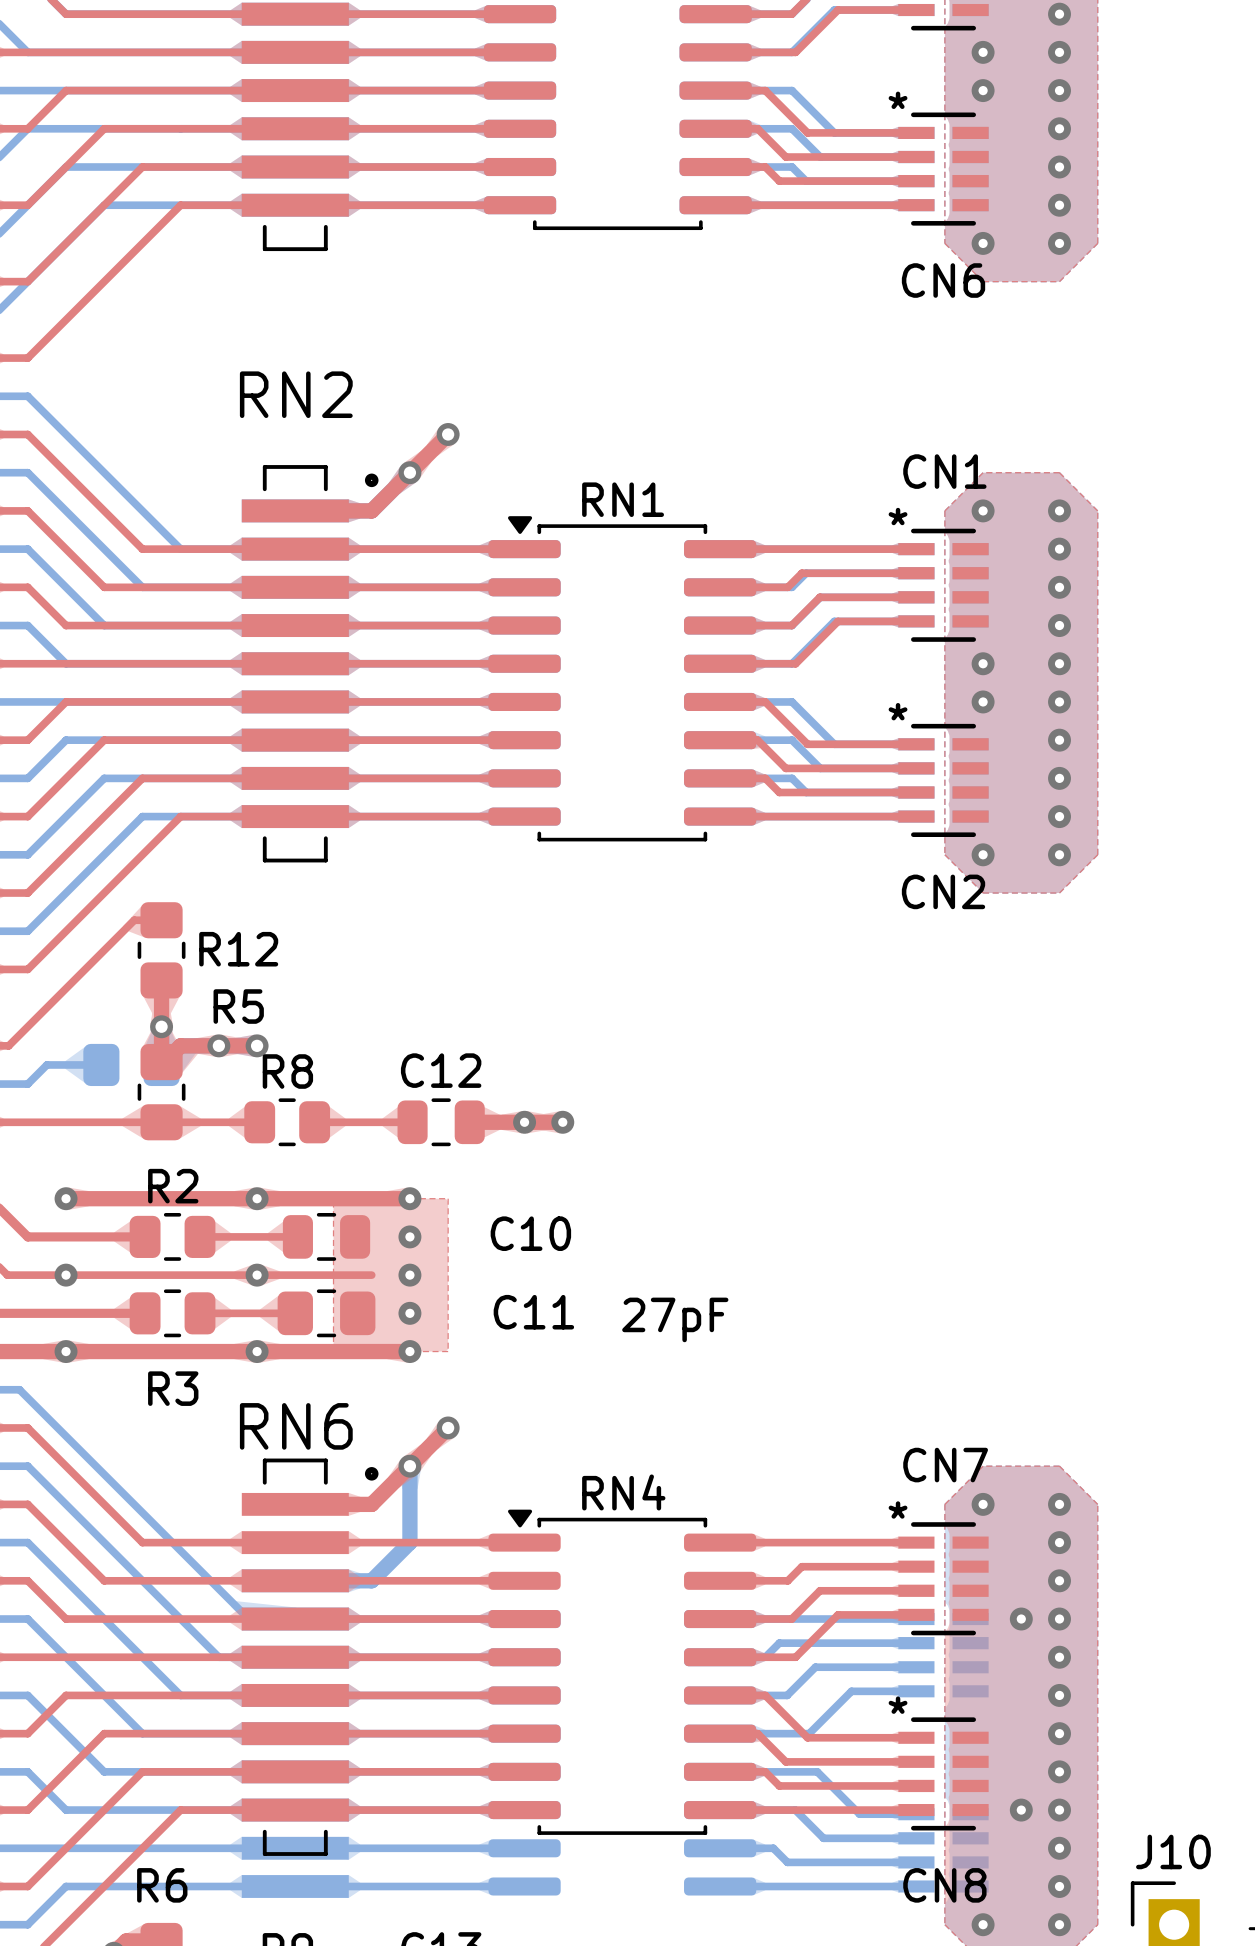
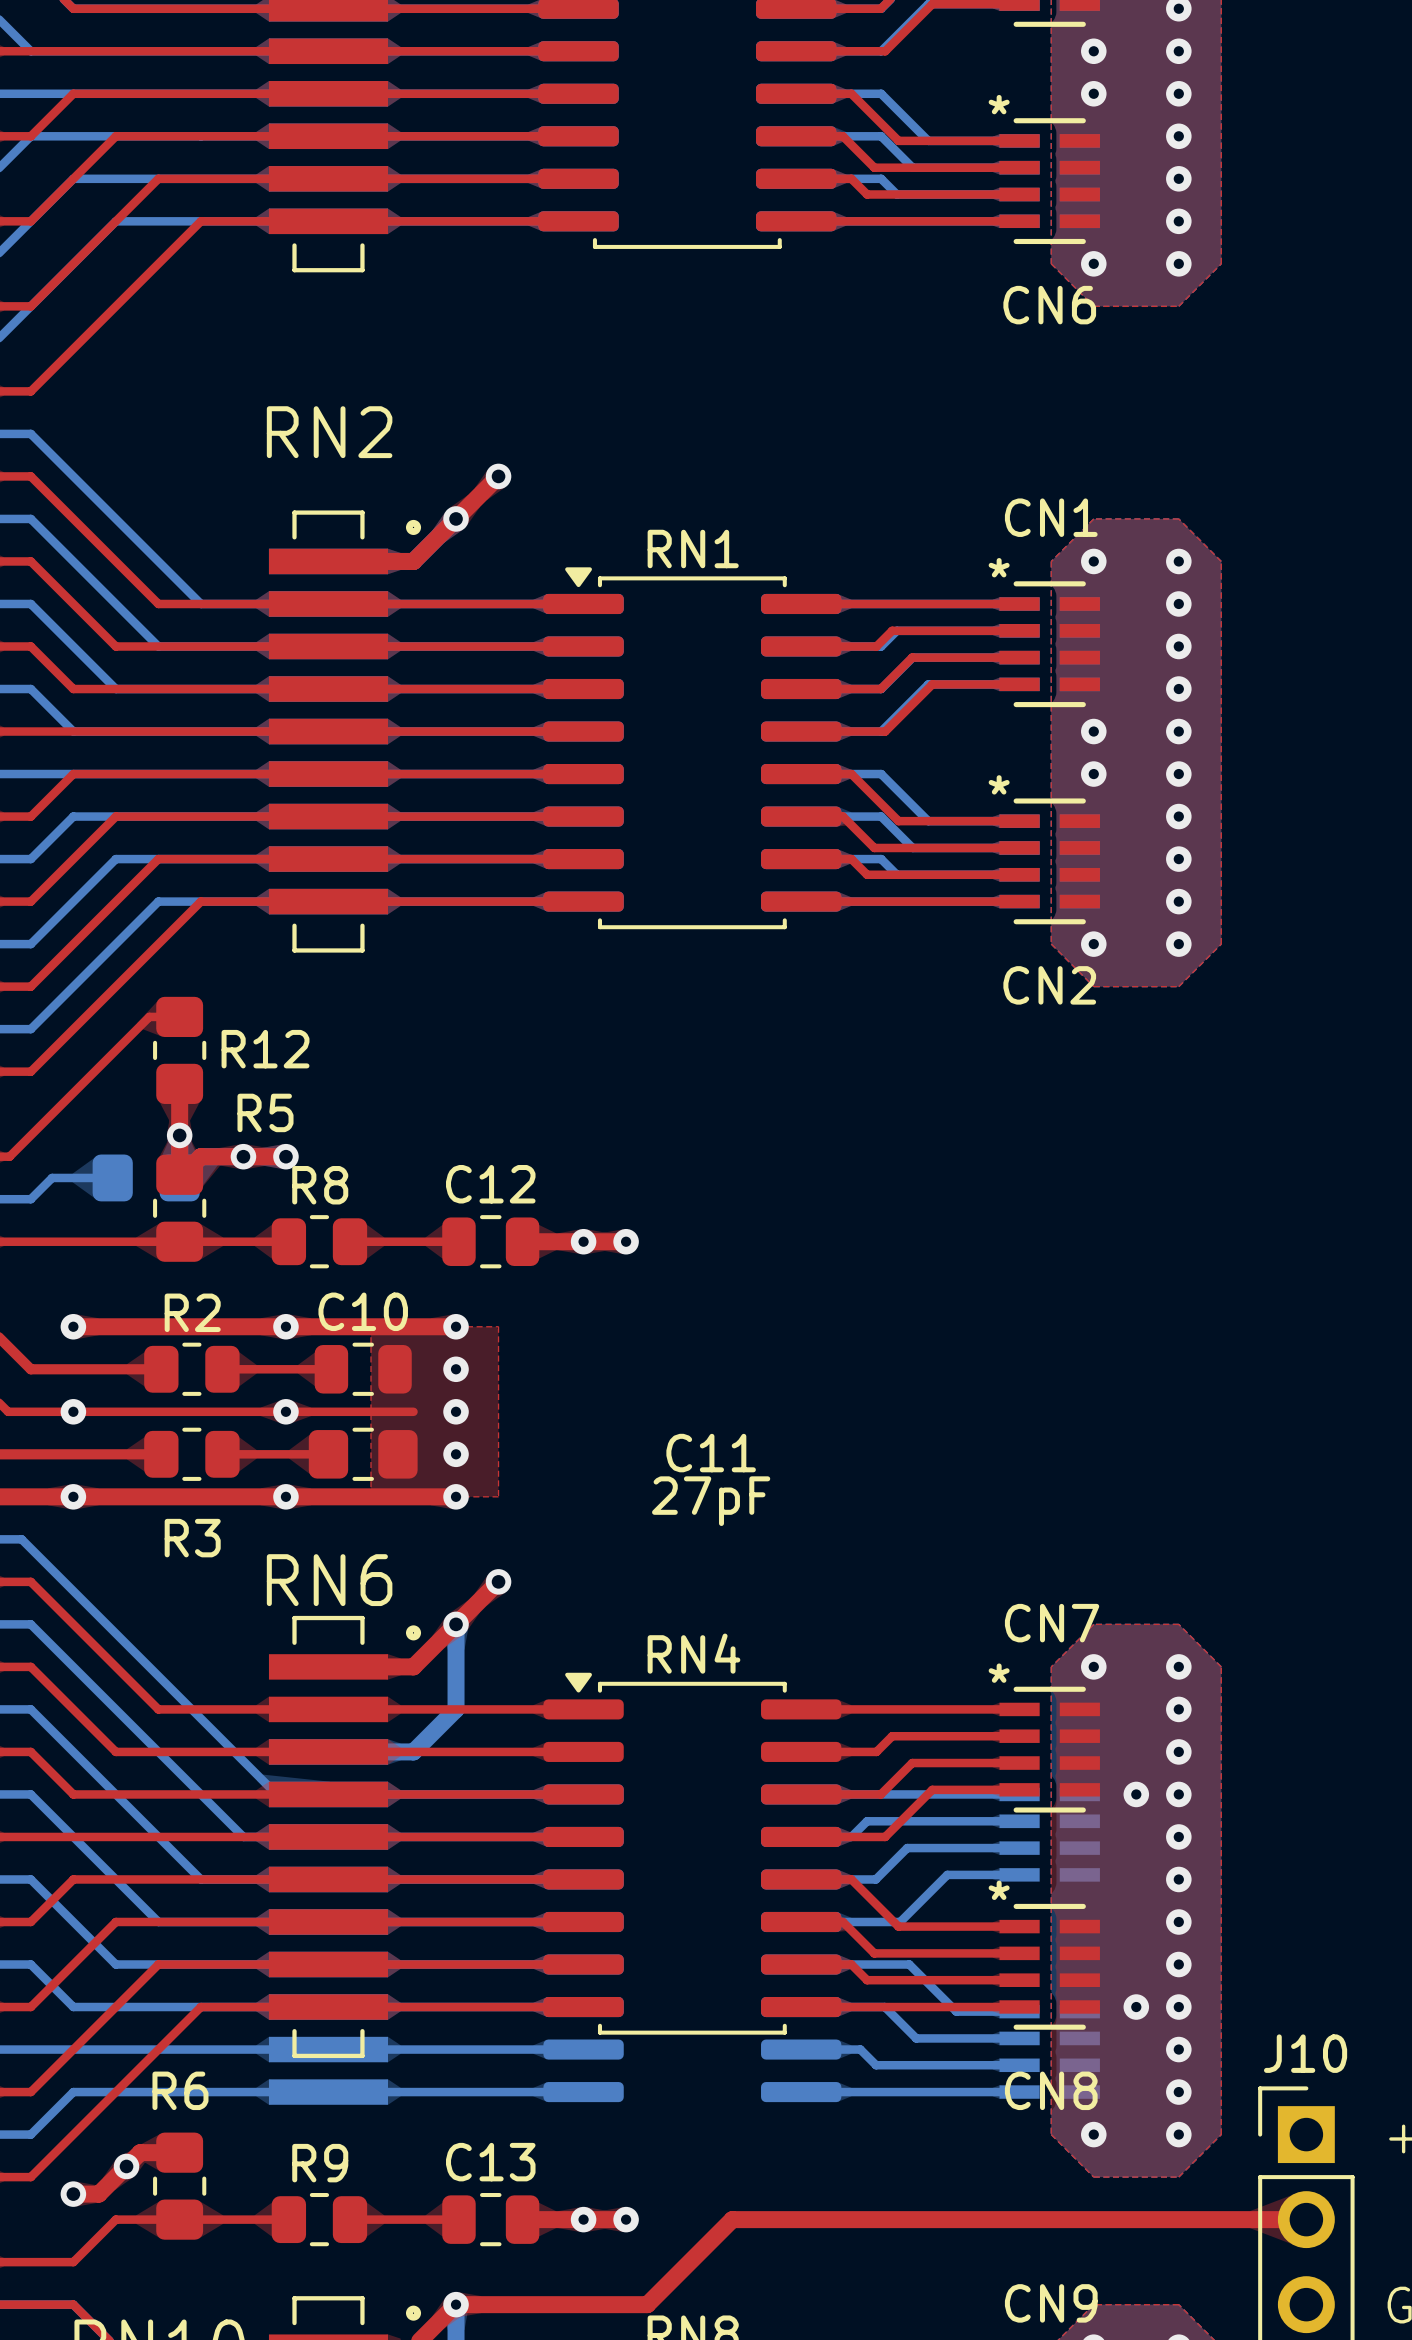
C10 name position: C10 (530, 1233) -> C10 (363, 1311)
C11 name position: C11 (533, 1312) -> C11 (711, 1453)
C11 value position: 27pF (675, 1319) -> 27pF (711, 1501)

